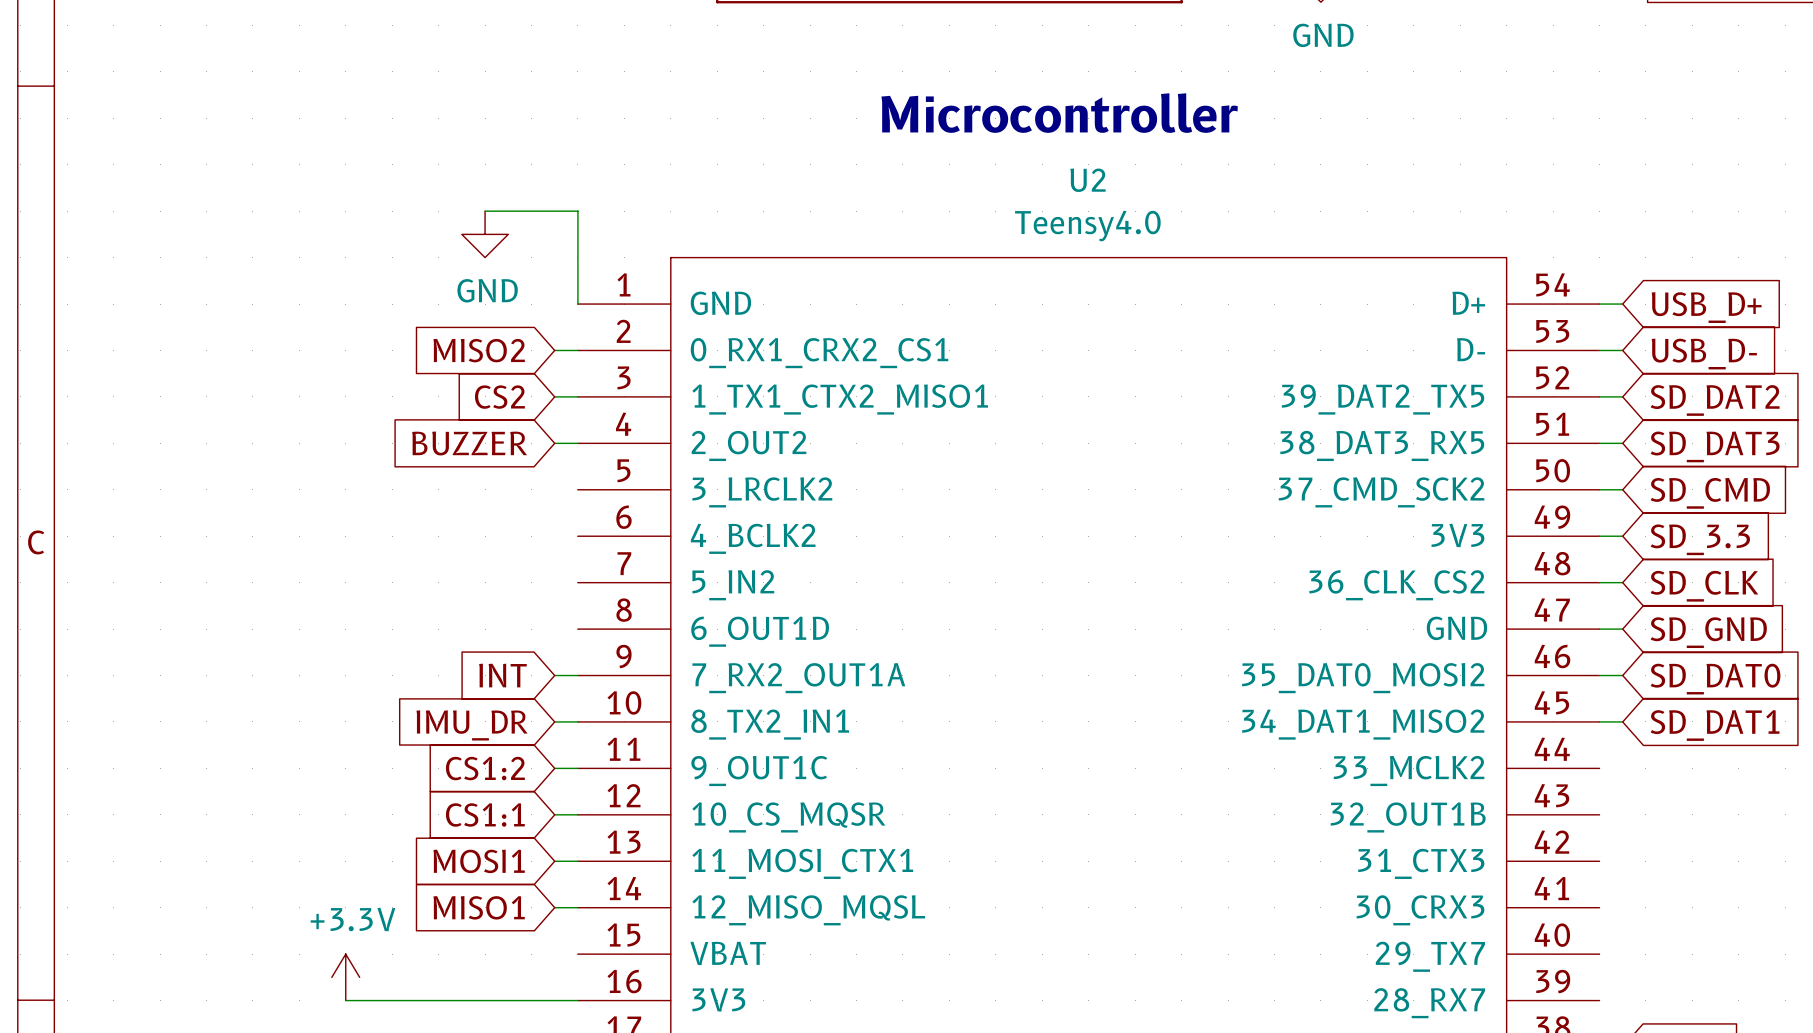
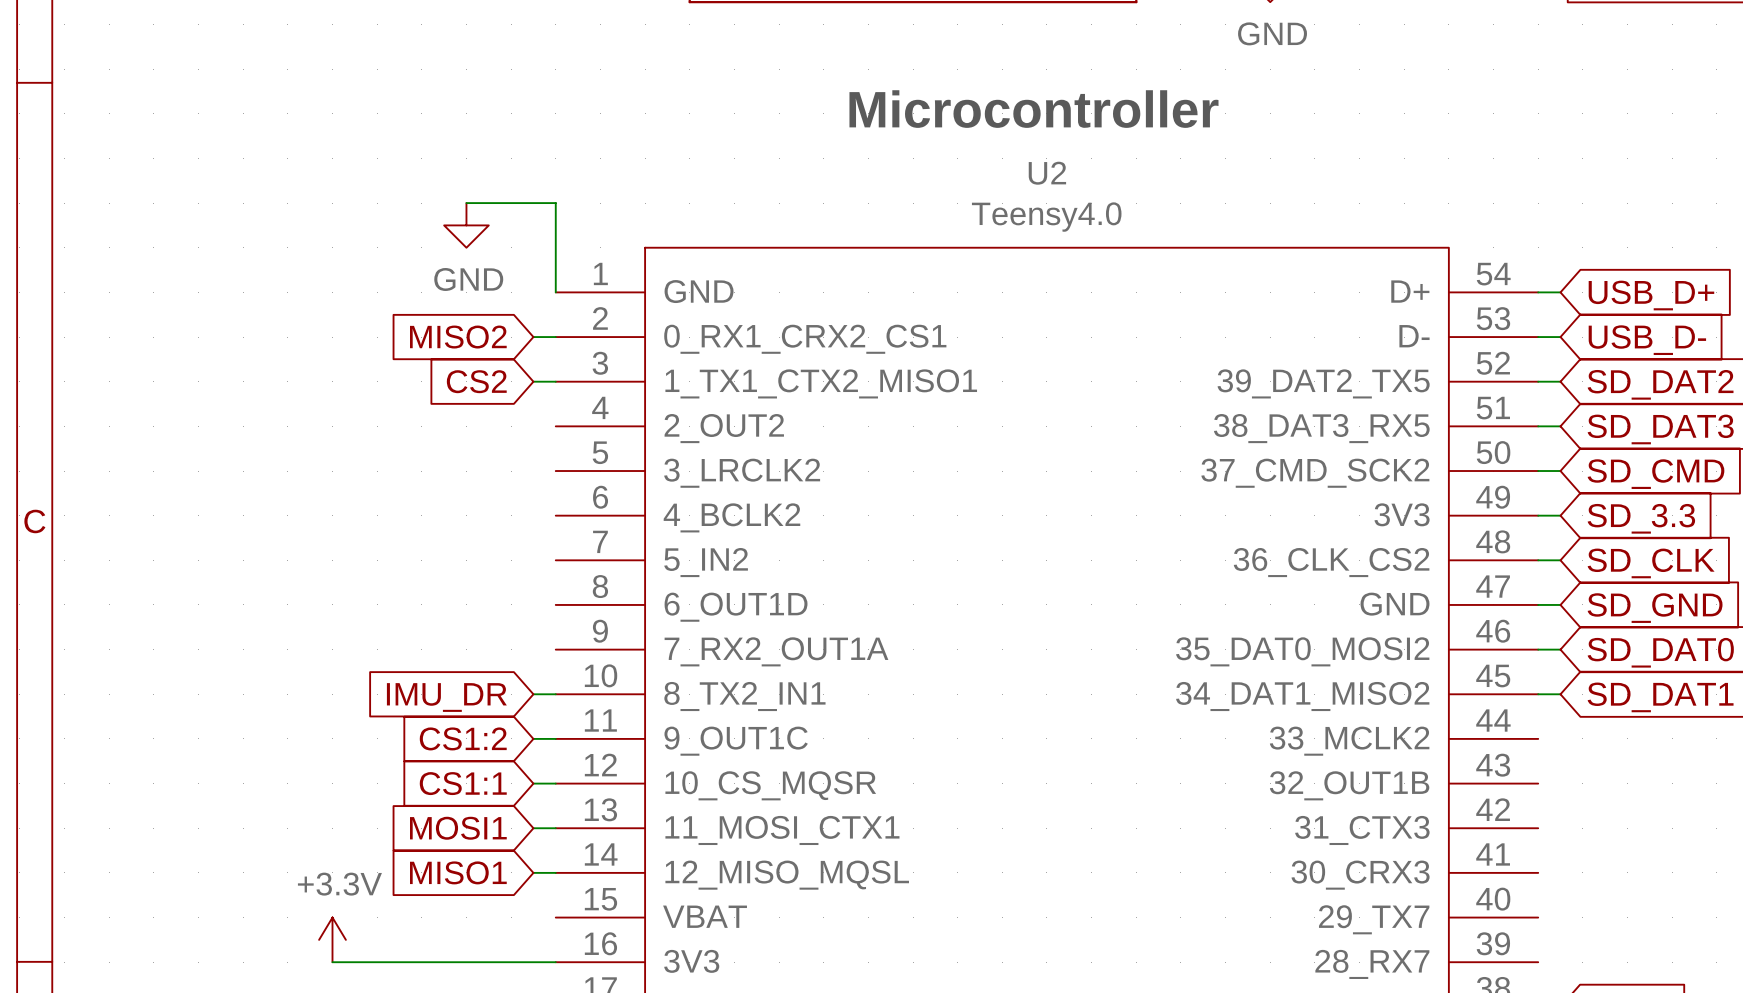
global label: BUZZER (469, 443) -> none
wire: (554, 443) (577, 443) -> none
global label: INT (502, 675) -> none
wire: (554, 675) (577, 675) -> none

